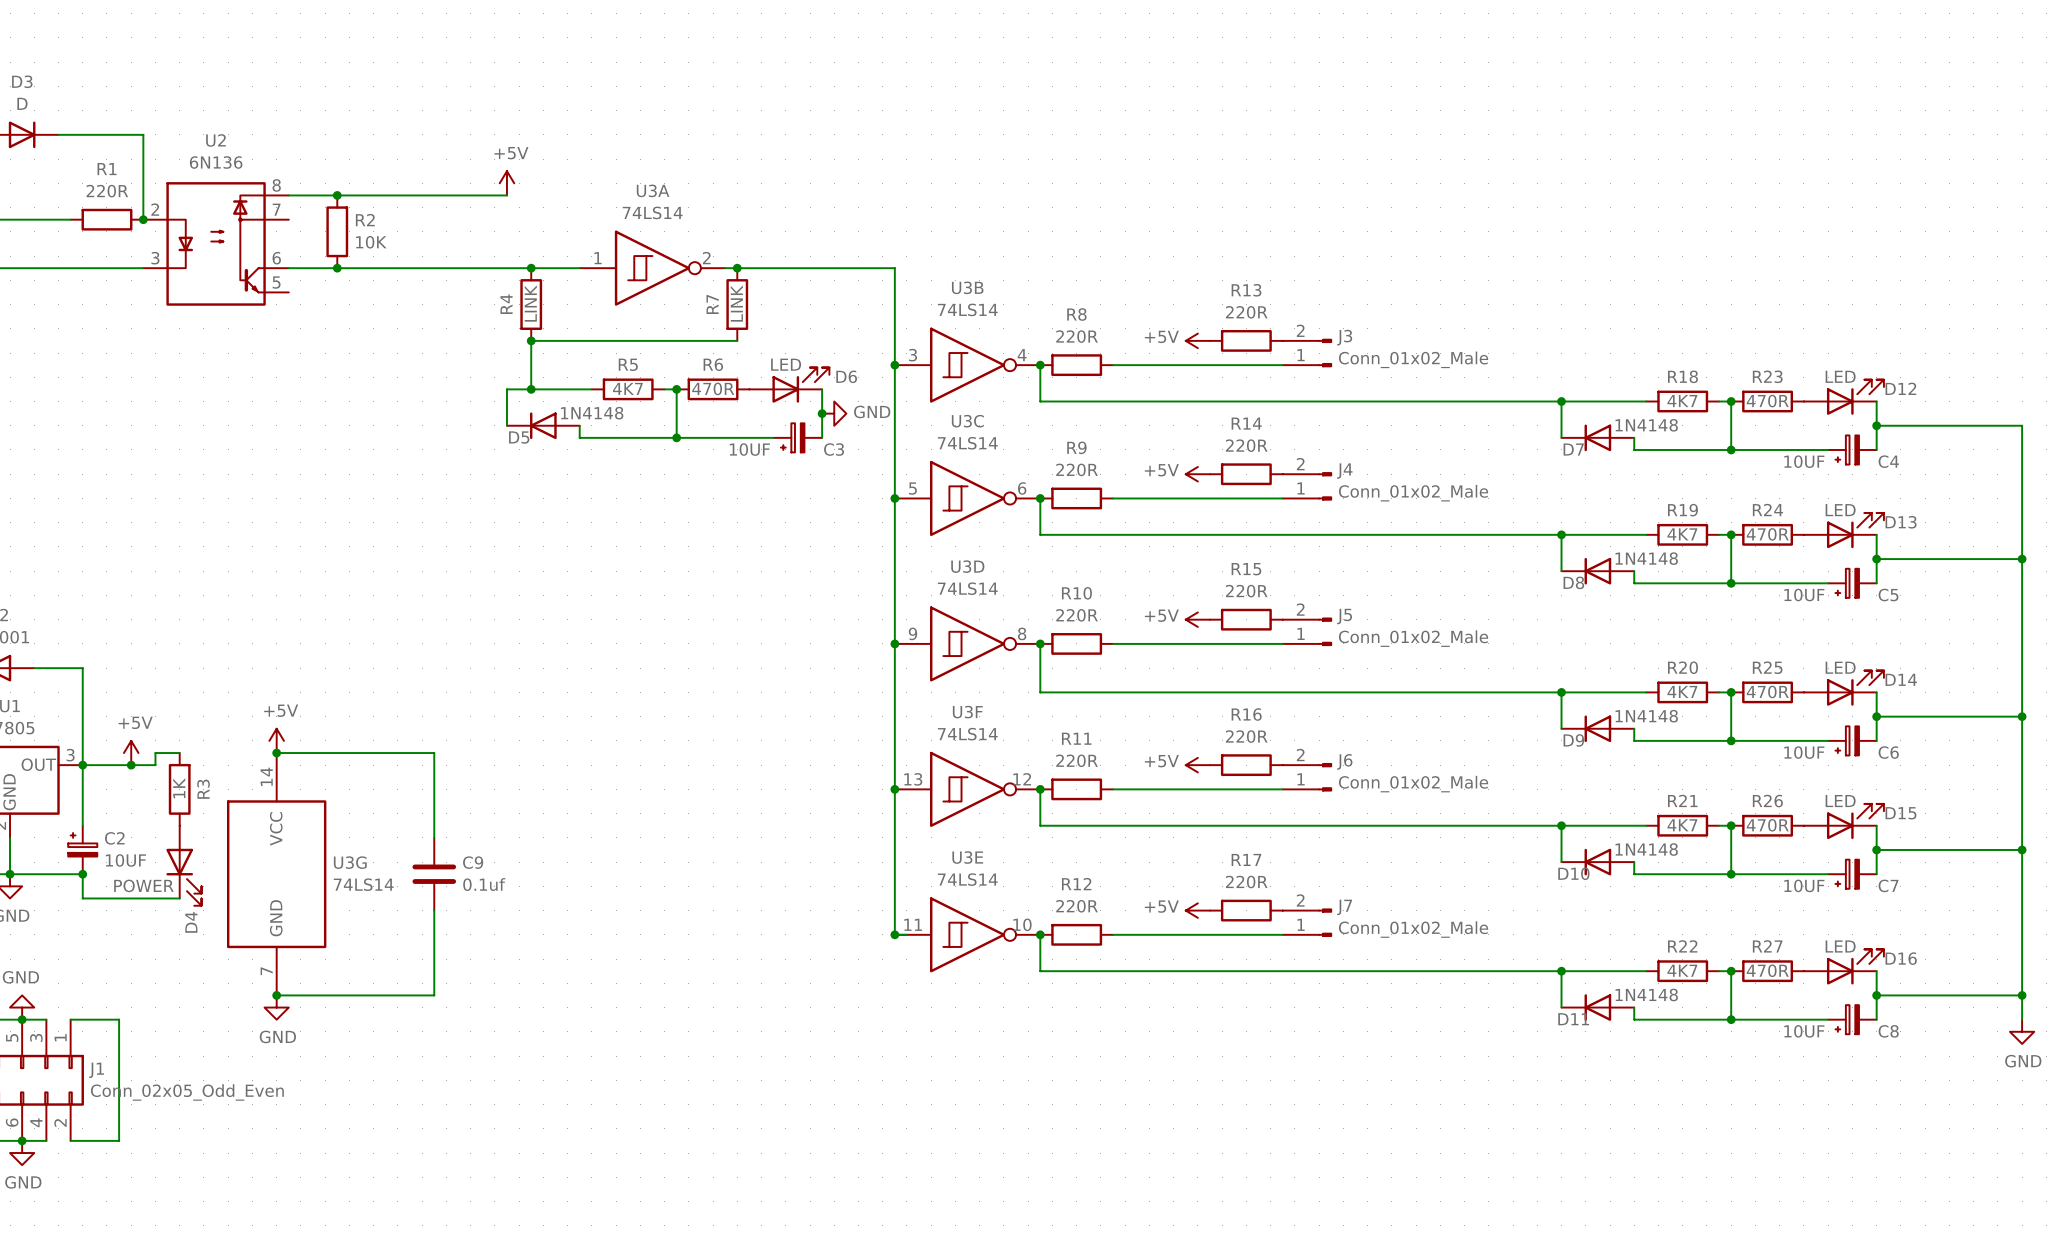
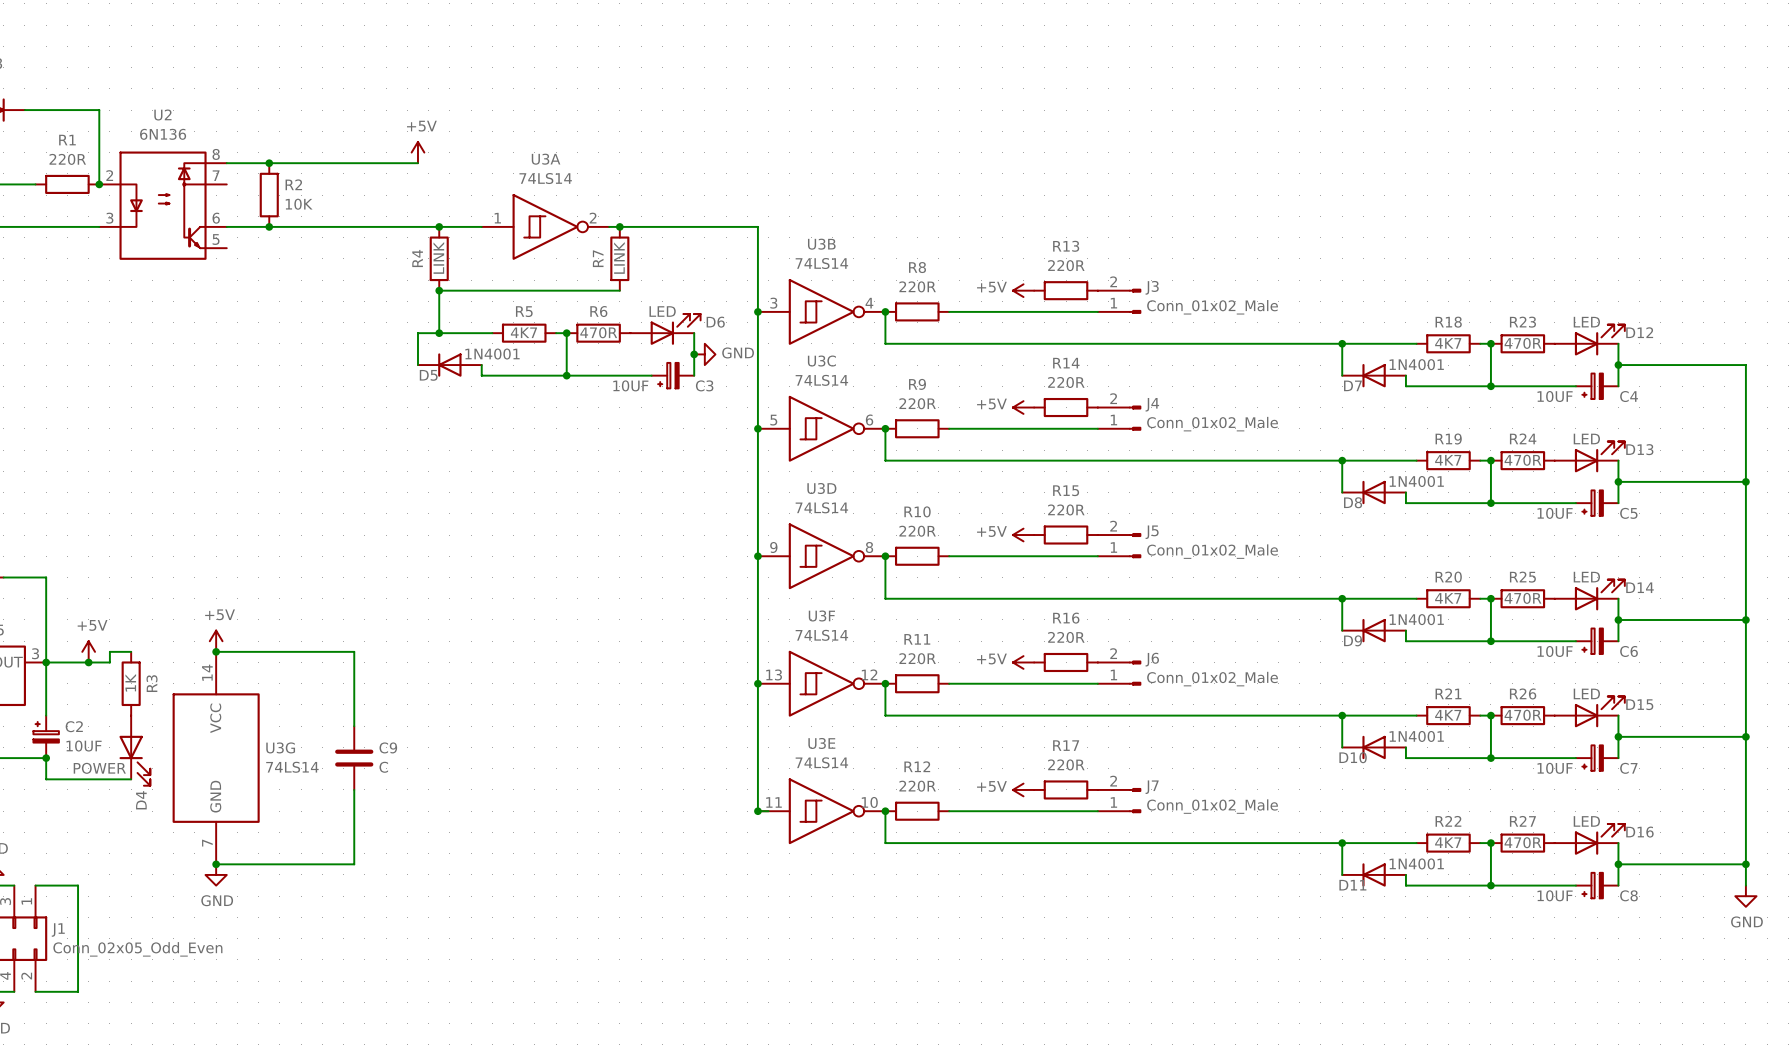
D5 value: 1N4148 (592, 413) -> 1N4001 (492, 354)
D7 value: 1N4148 (1646, 425) -> 1N4001 (1416, 364)
D8 value: 1N4148 (1646, 558) -> 1N4001 (1416, 481)
D9 value: 1N4148 (1646, 716) -> 1N4001 (1416, 619)
D10 value: 1N4148 (1646, 849) -> 1N4001 (1416, 736)
C9 value: 0.1uf (484, 884) -> C (383, 767)
D11 value: 1N4148 (1646, 994) -> 1N4001 (1416, 863)

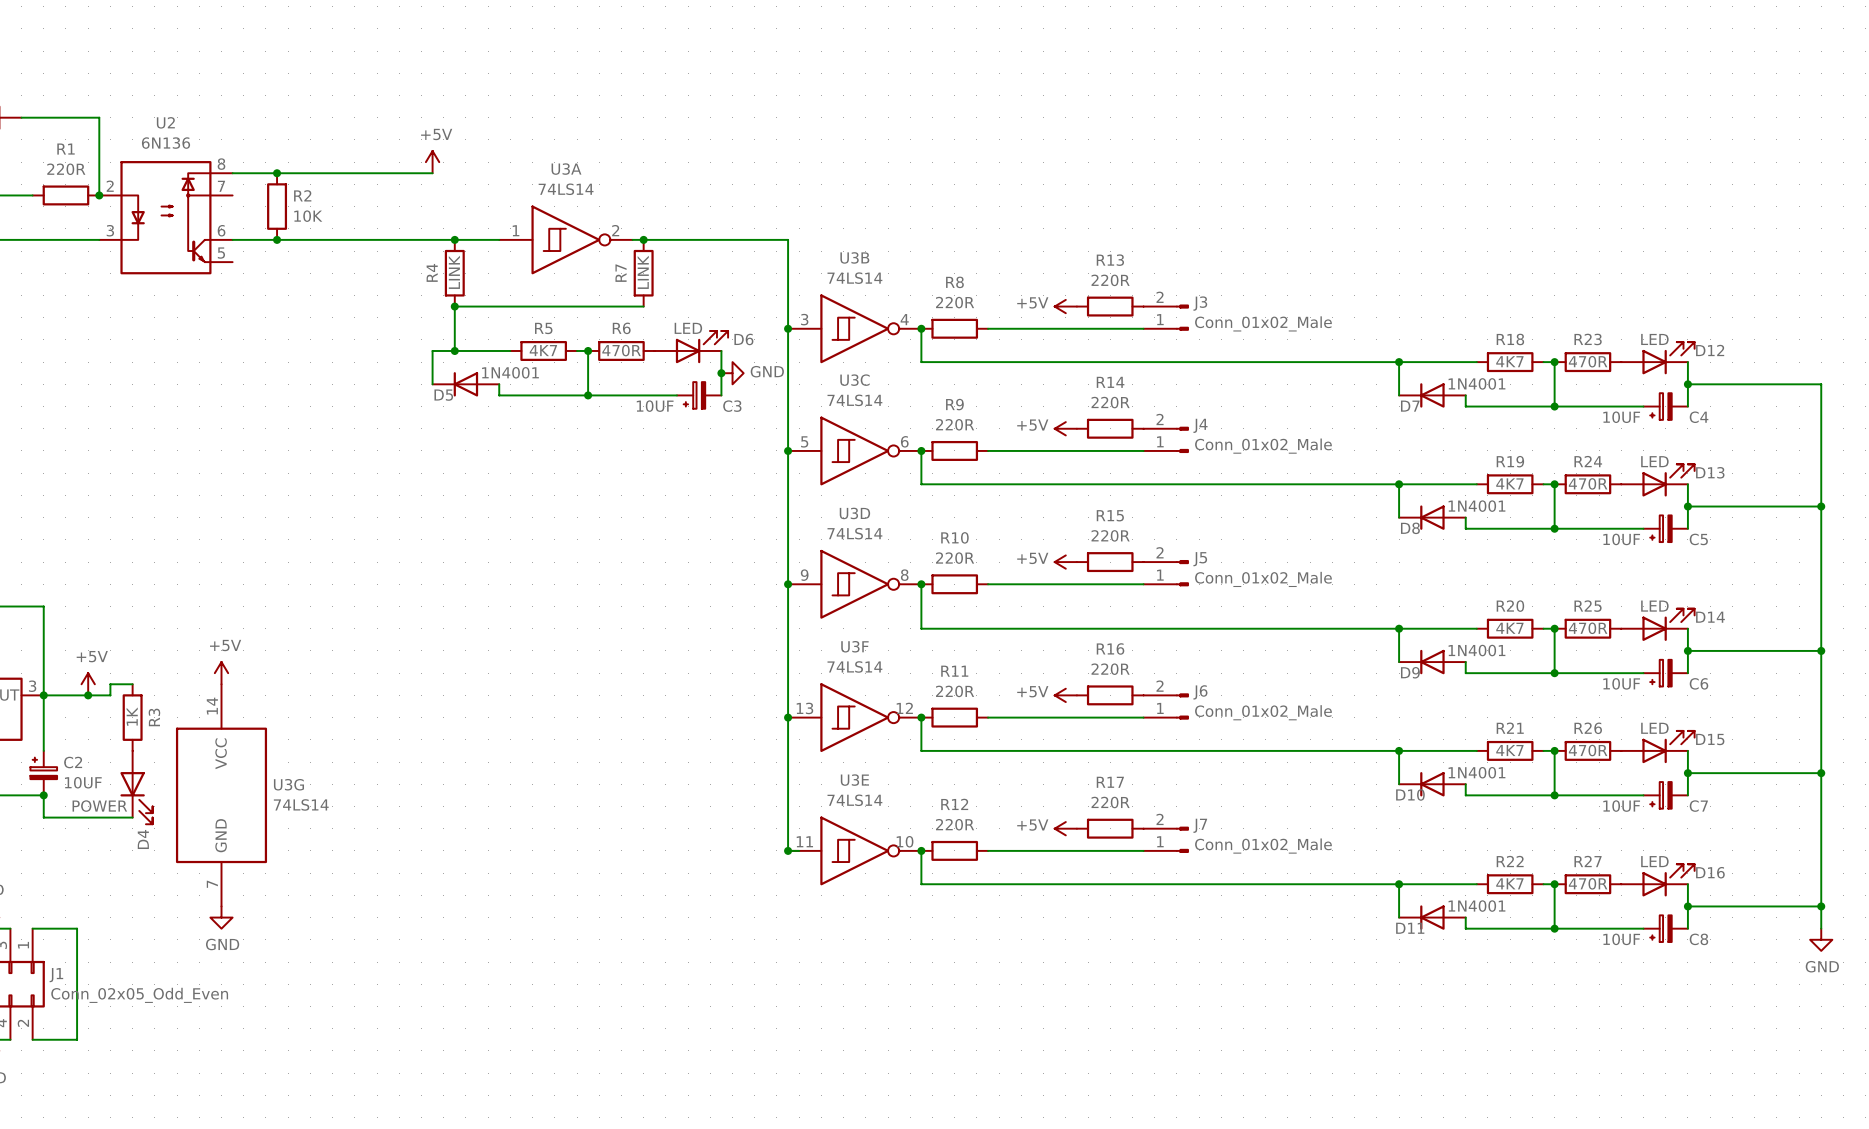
wire: (216, 651) (354, 651) (354, 726) -> none
junction: (216, 651) -> none
C9: C (354, 758) -> none
wire: (354, 789) (354, 864) (216, 864) -> none
junction: (216, 864) -> none

